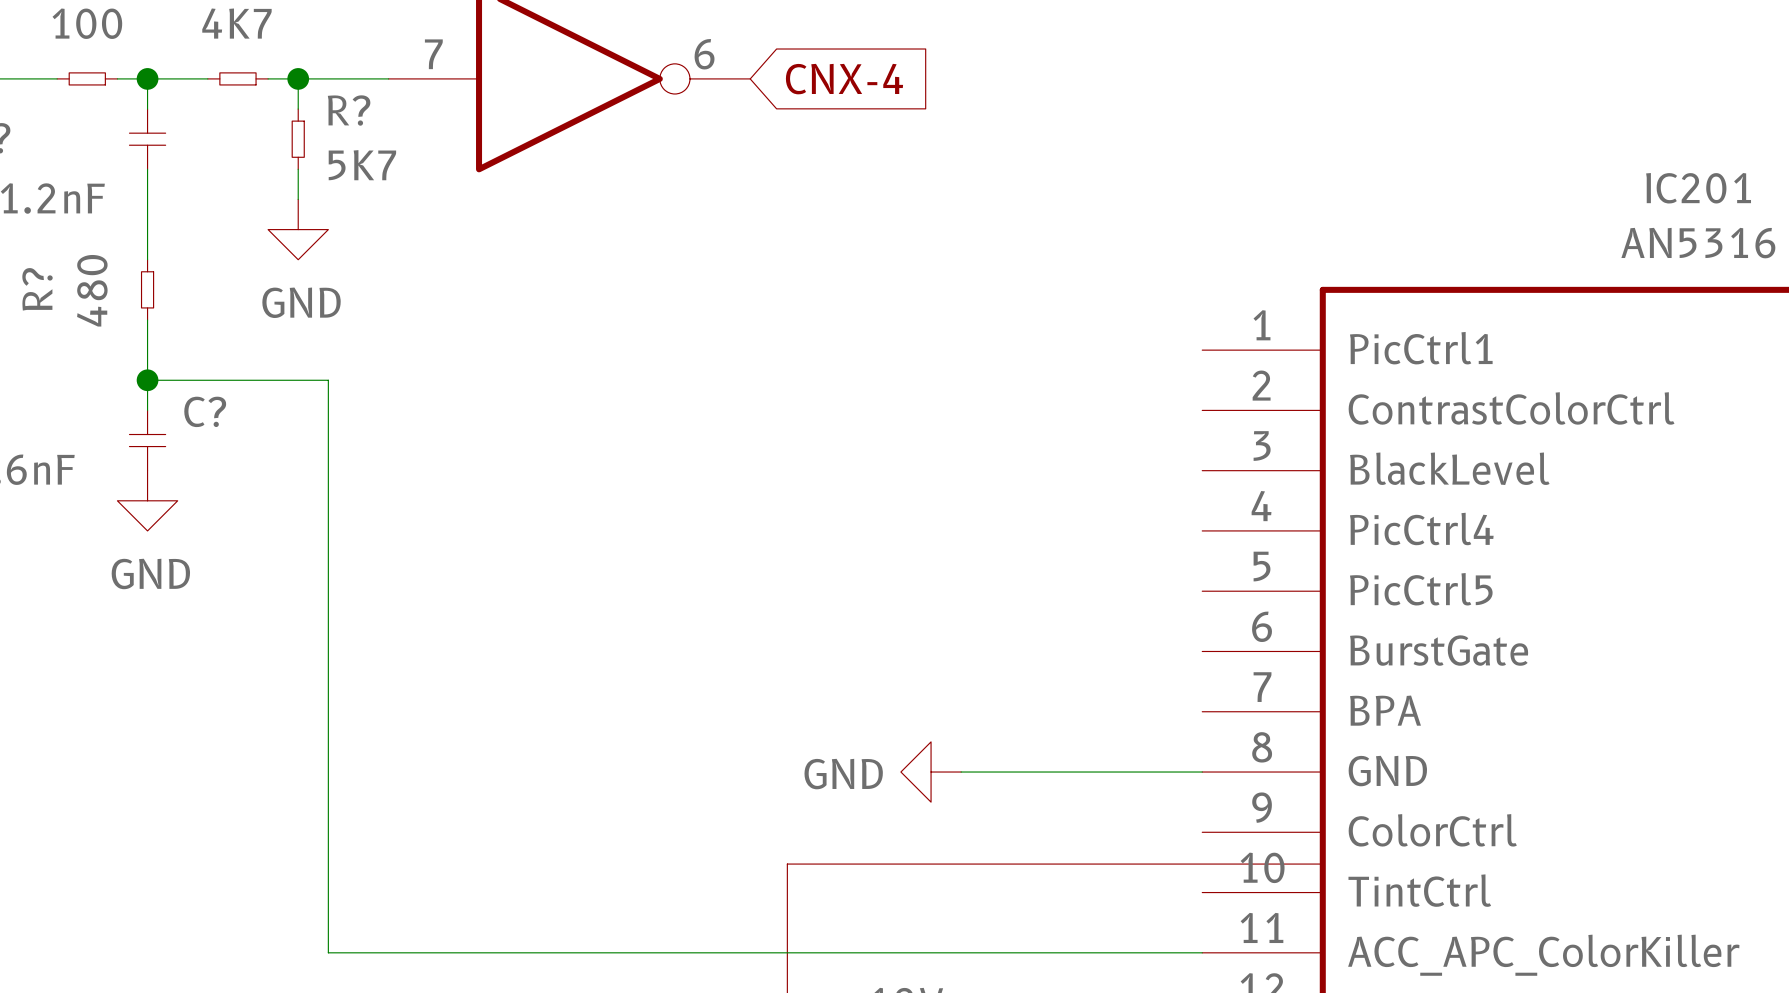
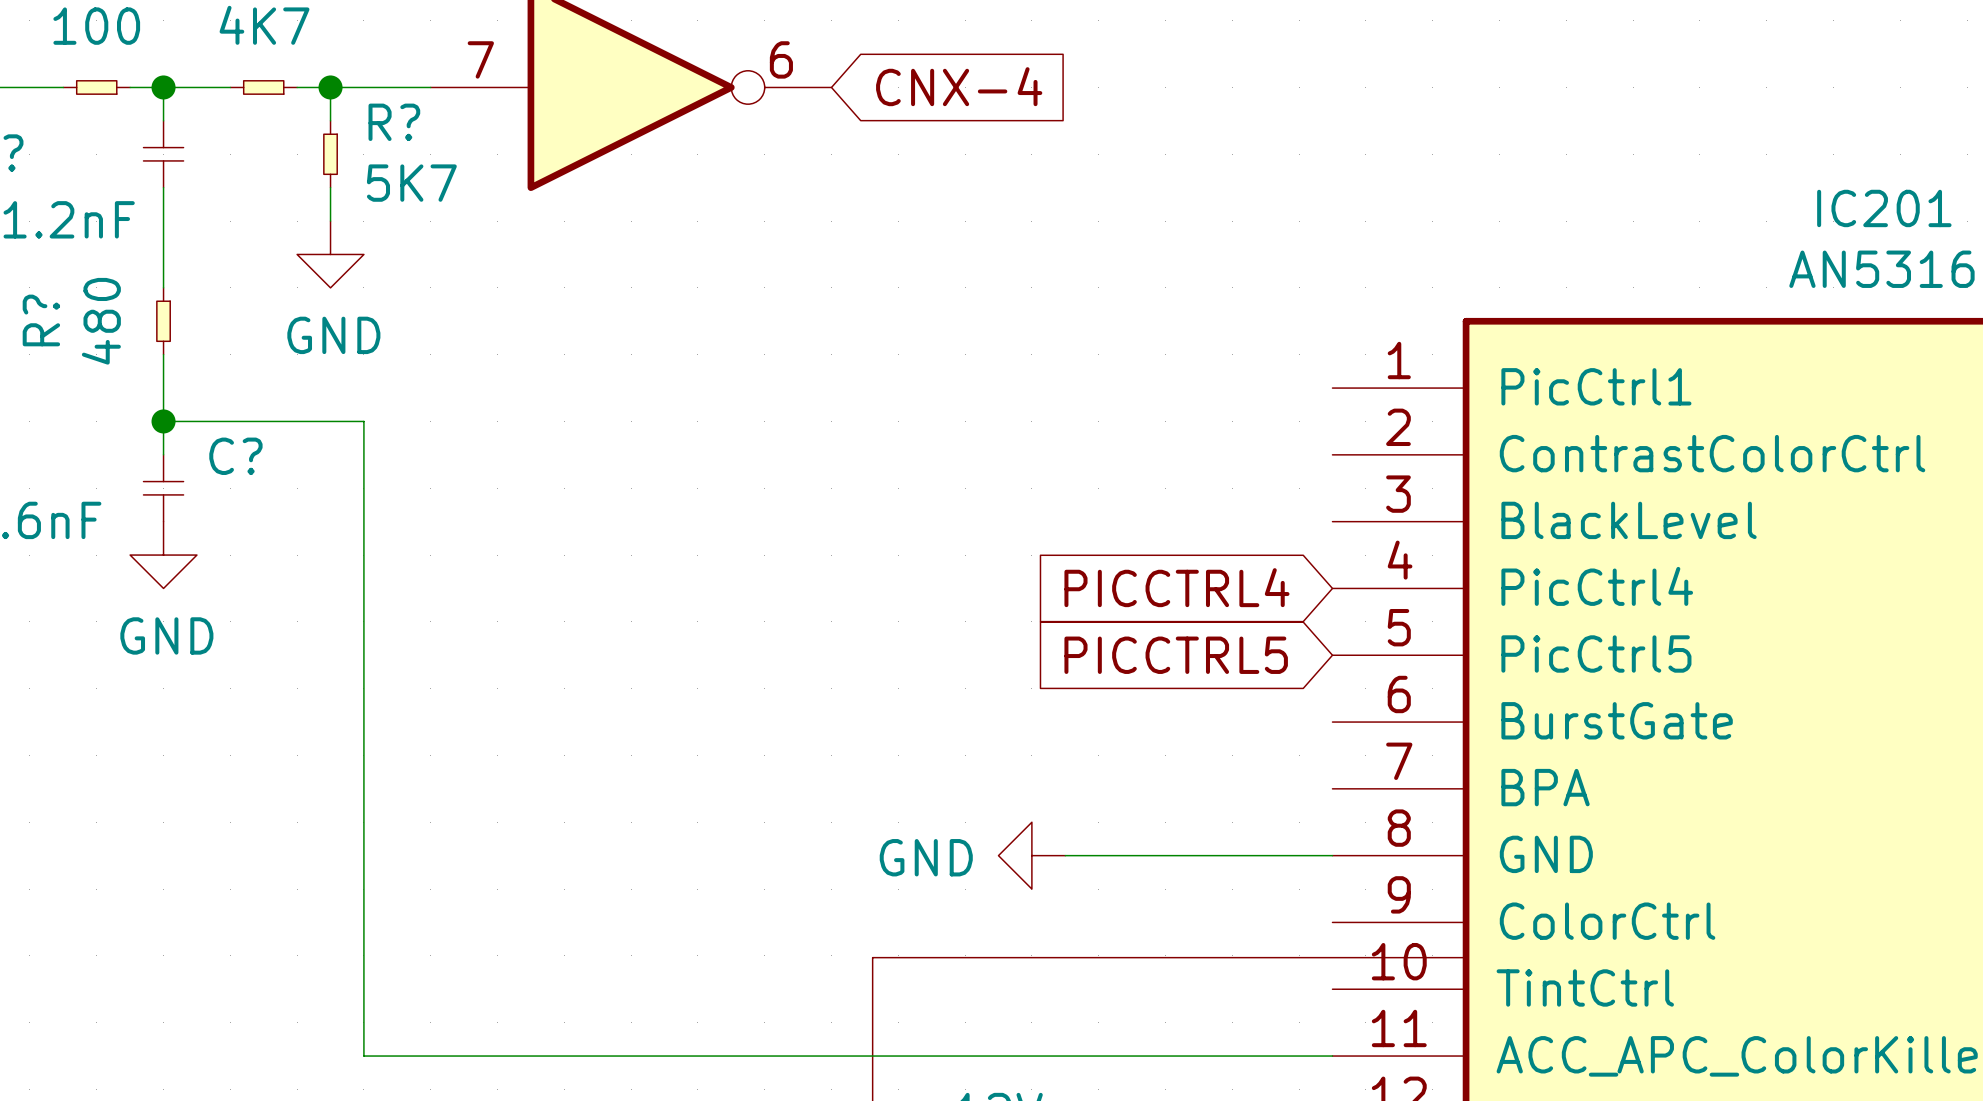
global label: none -> PICCTRL4 (1176, 587)
global label: none -> PICCTRL5 (1176, 655)

